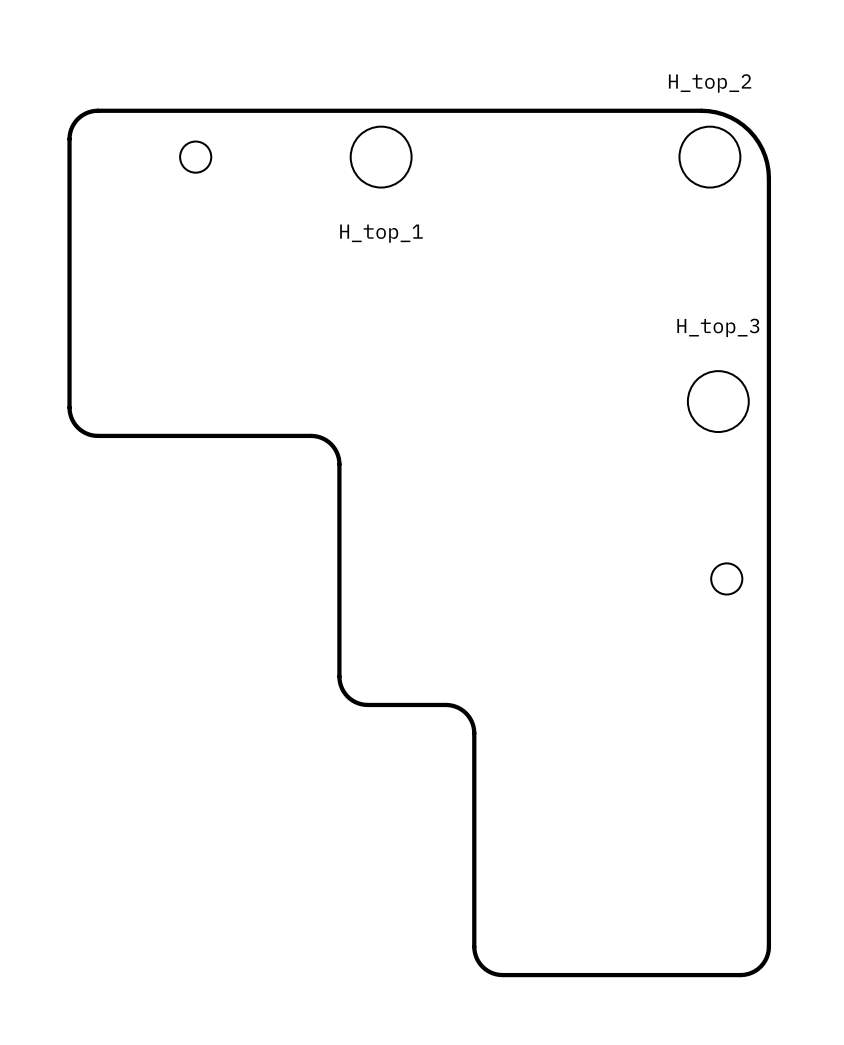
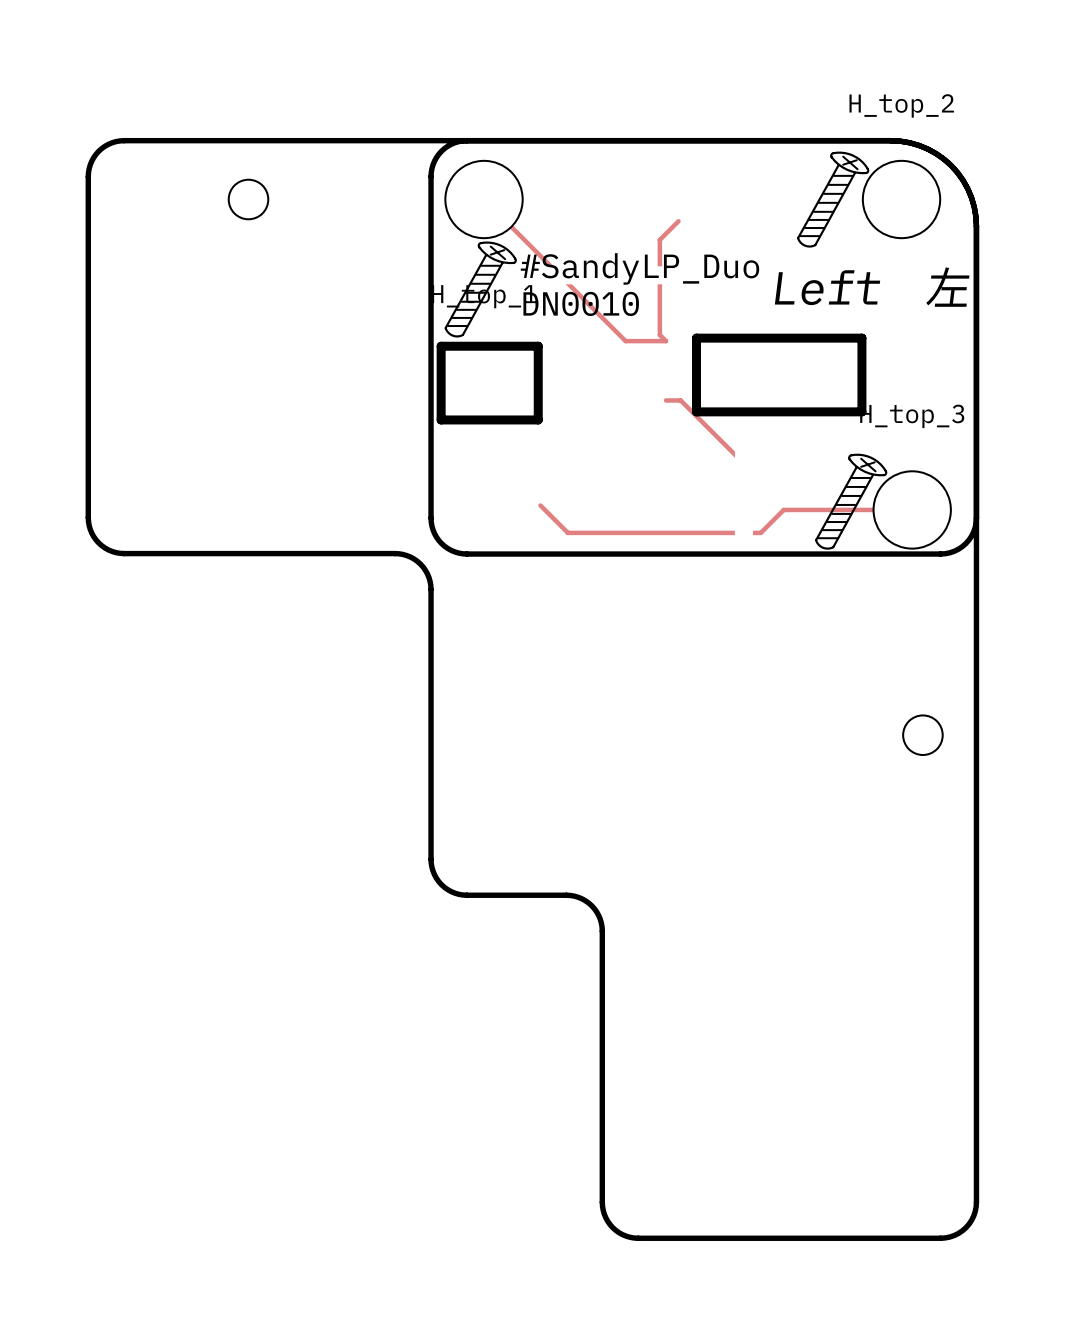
drawing: none -> [428, 137, 980, 557]
track: none -> (484, 199) (625, 341) (666, 341) (659, 334) (659, 239) (678, 221)
text: none -> #SandyLP_Duo (640, 268)
text: none -> Left 左 (872, 287)
text: none -> DN0010 (581, 303)
line: none -> (696, 338) (861, 338) (861, 411) (696, 411) (696, 338)
line: none -> (441, 346) (538, 346) (538, 419) (441, 419) (441, 346)
track: none -> (666, 400) (680, 400) (739, 459)
track: none -> (540, 505) (567, 532) (760, 532) (783, 509) (912, 509)

